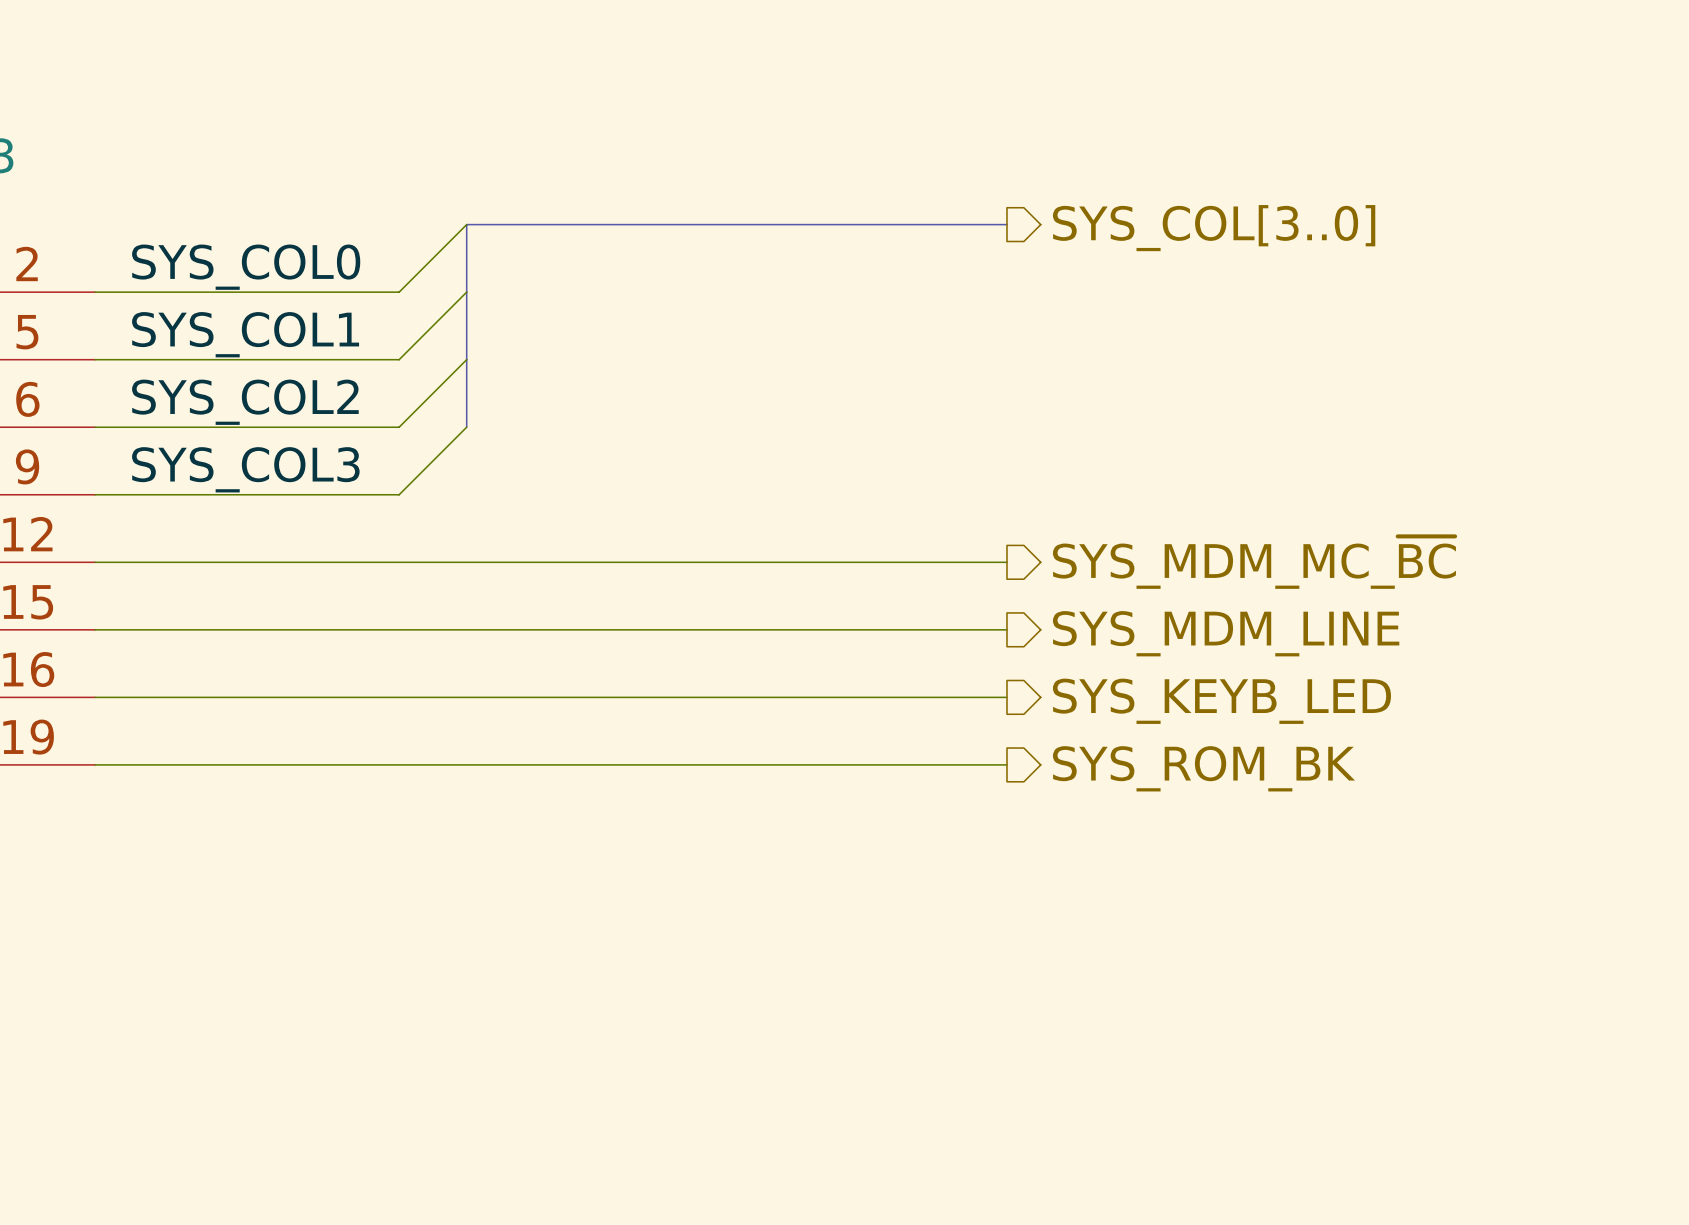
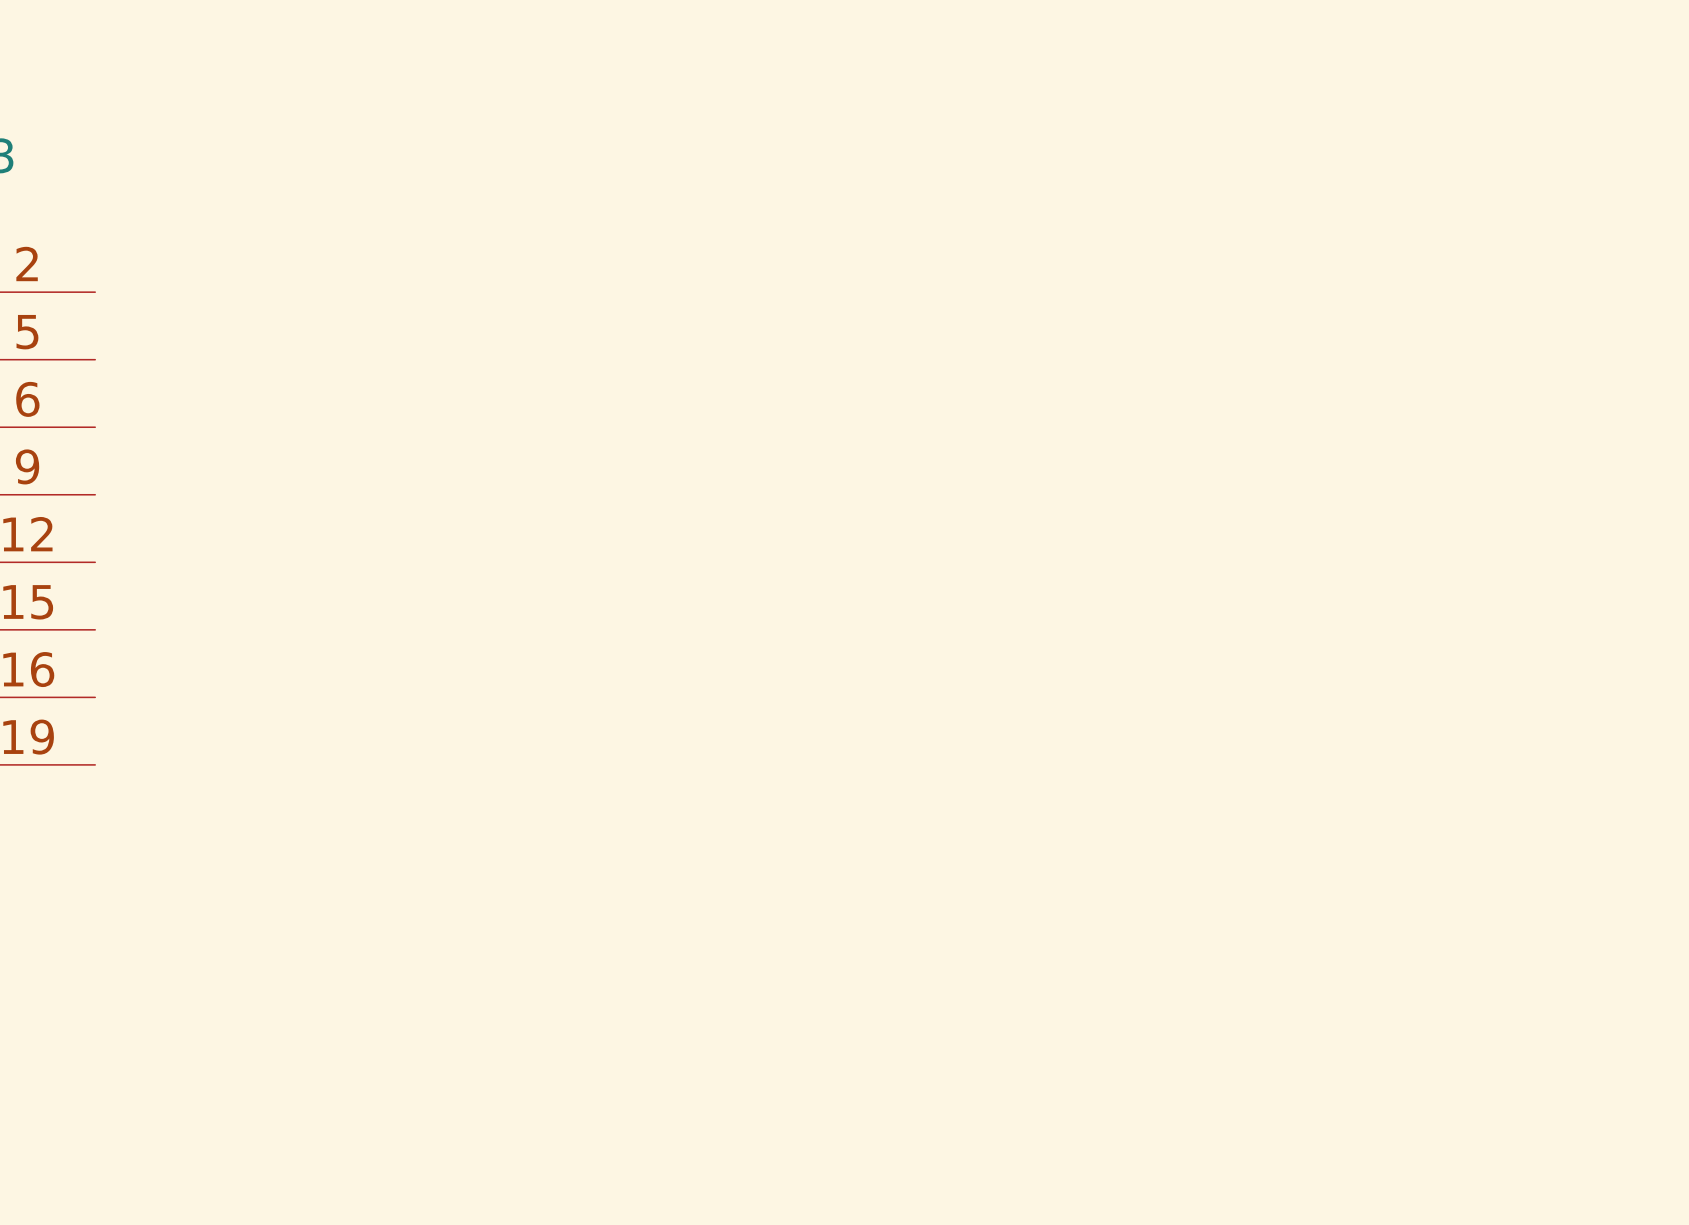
wire: (466, 224) (399, 292) (95, 292) -> none
bus: (1006, 224) (466, 224) (466, 427) -> none
hierarchical label: SYS_COL[3..0] (1214, 228) -> none
label: SYS_COL0 (246, 267) -> none
wire: (466, 292) (399, 359) (95, 359) -> none
label: SYS_COL1 (245, 334) -> none
wire: (466, 359) (399, 427) (95, 427) -> none
label: SYS_COL2 (245, 402) -> none
wire: (466, 427) (399, 494) (95, 494) -> none
label: SYS_COL3 (245, 469) -> none
wire: (95, 562) (1006, 562) -> none
hierarchical label: SYS_MDM_MC_~{BC} (1254, 562) -> none
wire: (95, 629) (1006, 629) -> none
hierarchical label: SYS_MDM_LINE (1226, 633) -> none
wire: (95, 697) (1006, 697) -> none
hierarchical label: SYS_KEYB_LED (1221, 701) -> none
wire: (95, 764) (1006, 764) -> none
hierarchical label: SYS_ROM_BK (1203, 768) -> none

